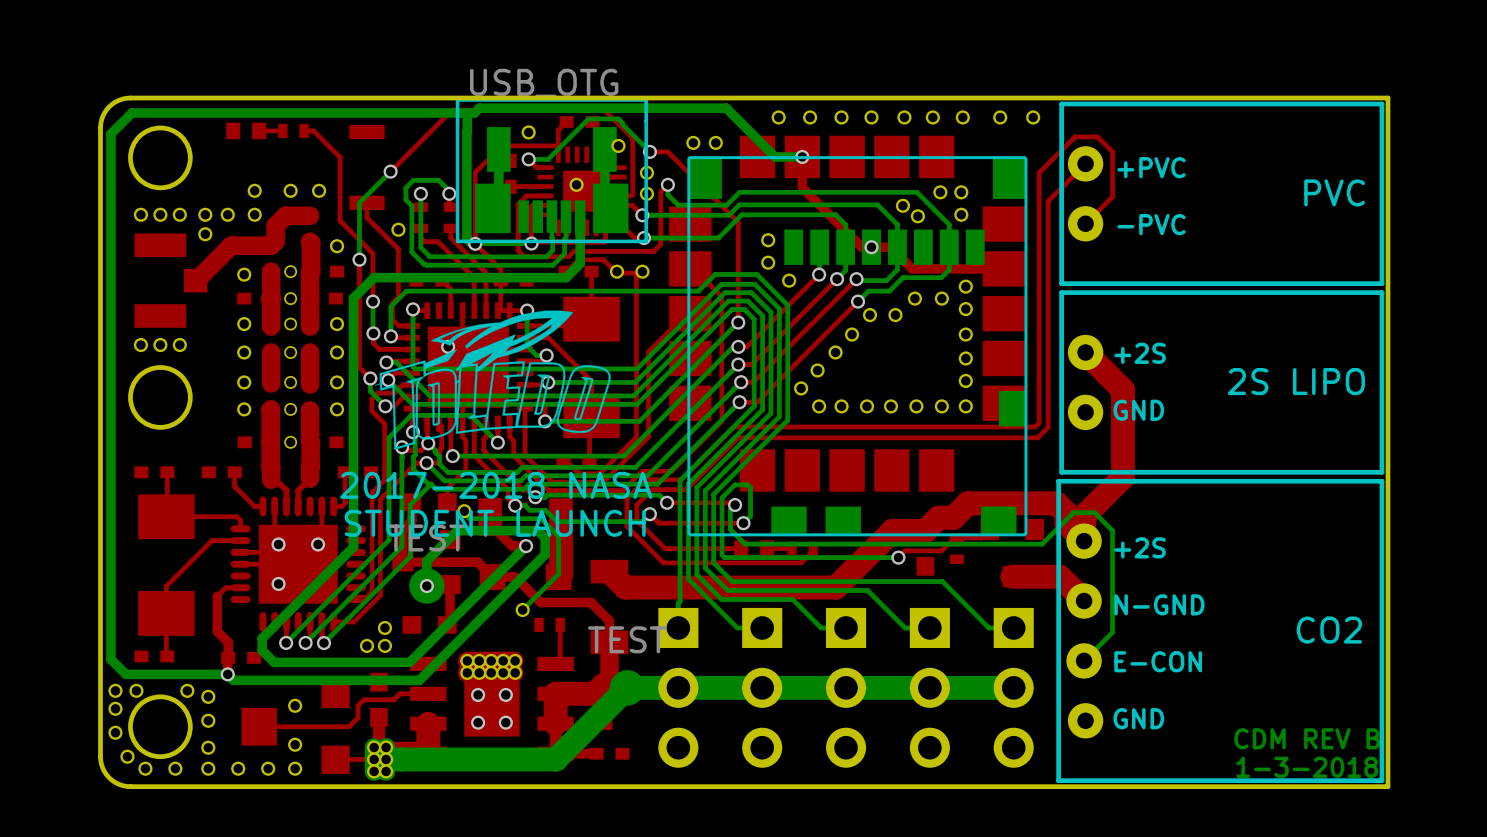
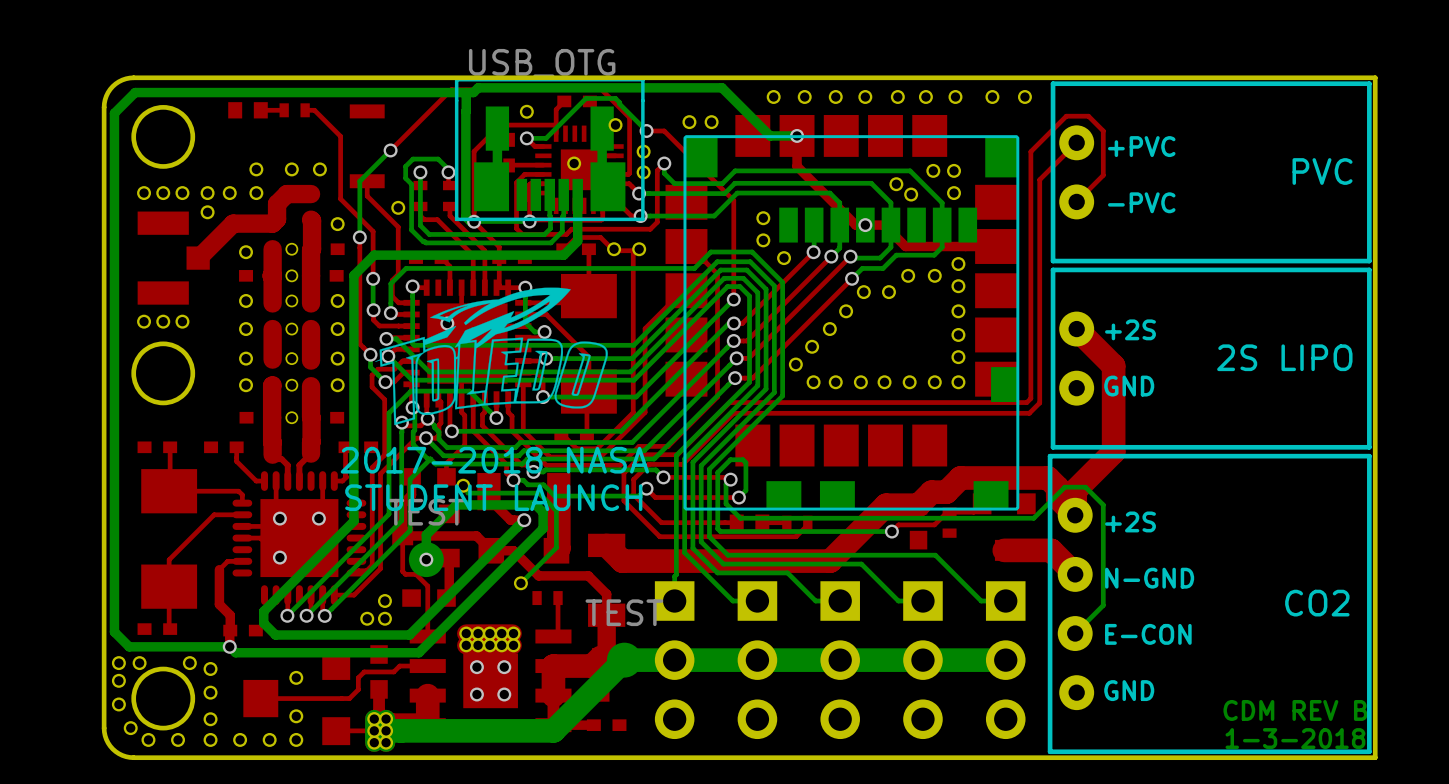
top track: none -> (402, 535) (402, 571) (405, 574) (416, 574) (427, 586) (427, 636)

